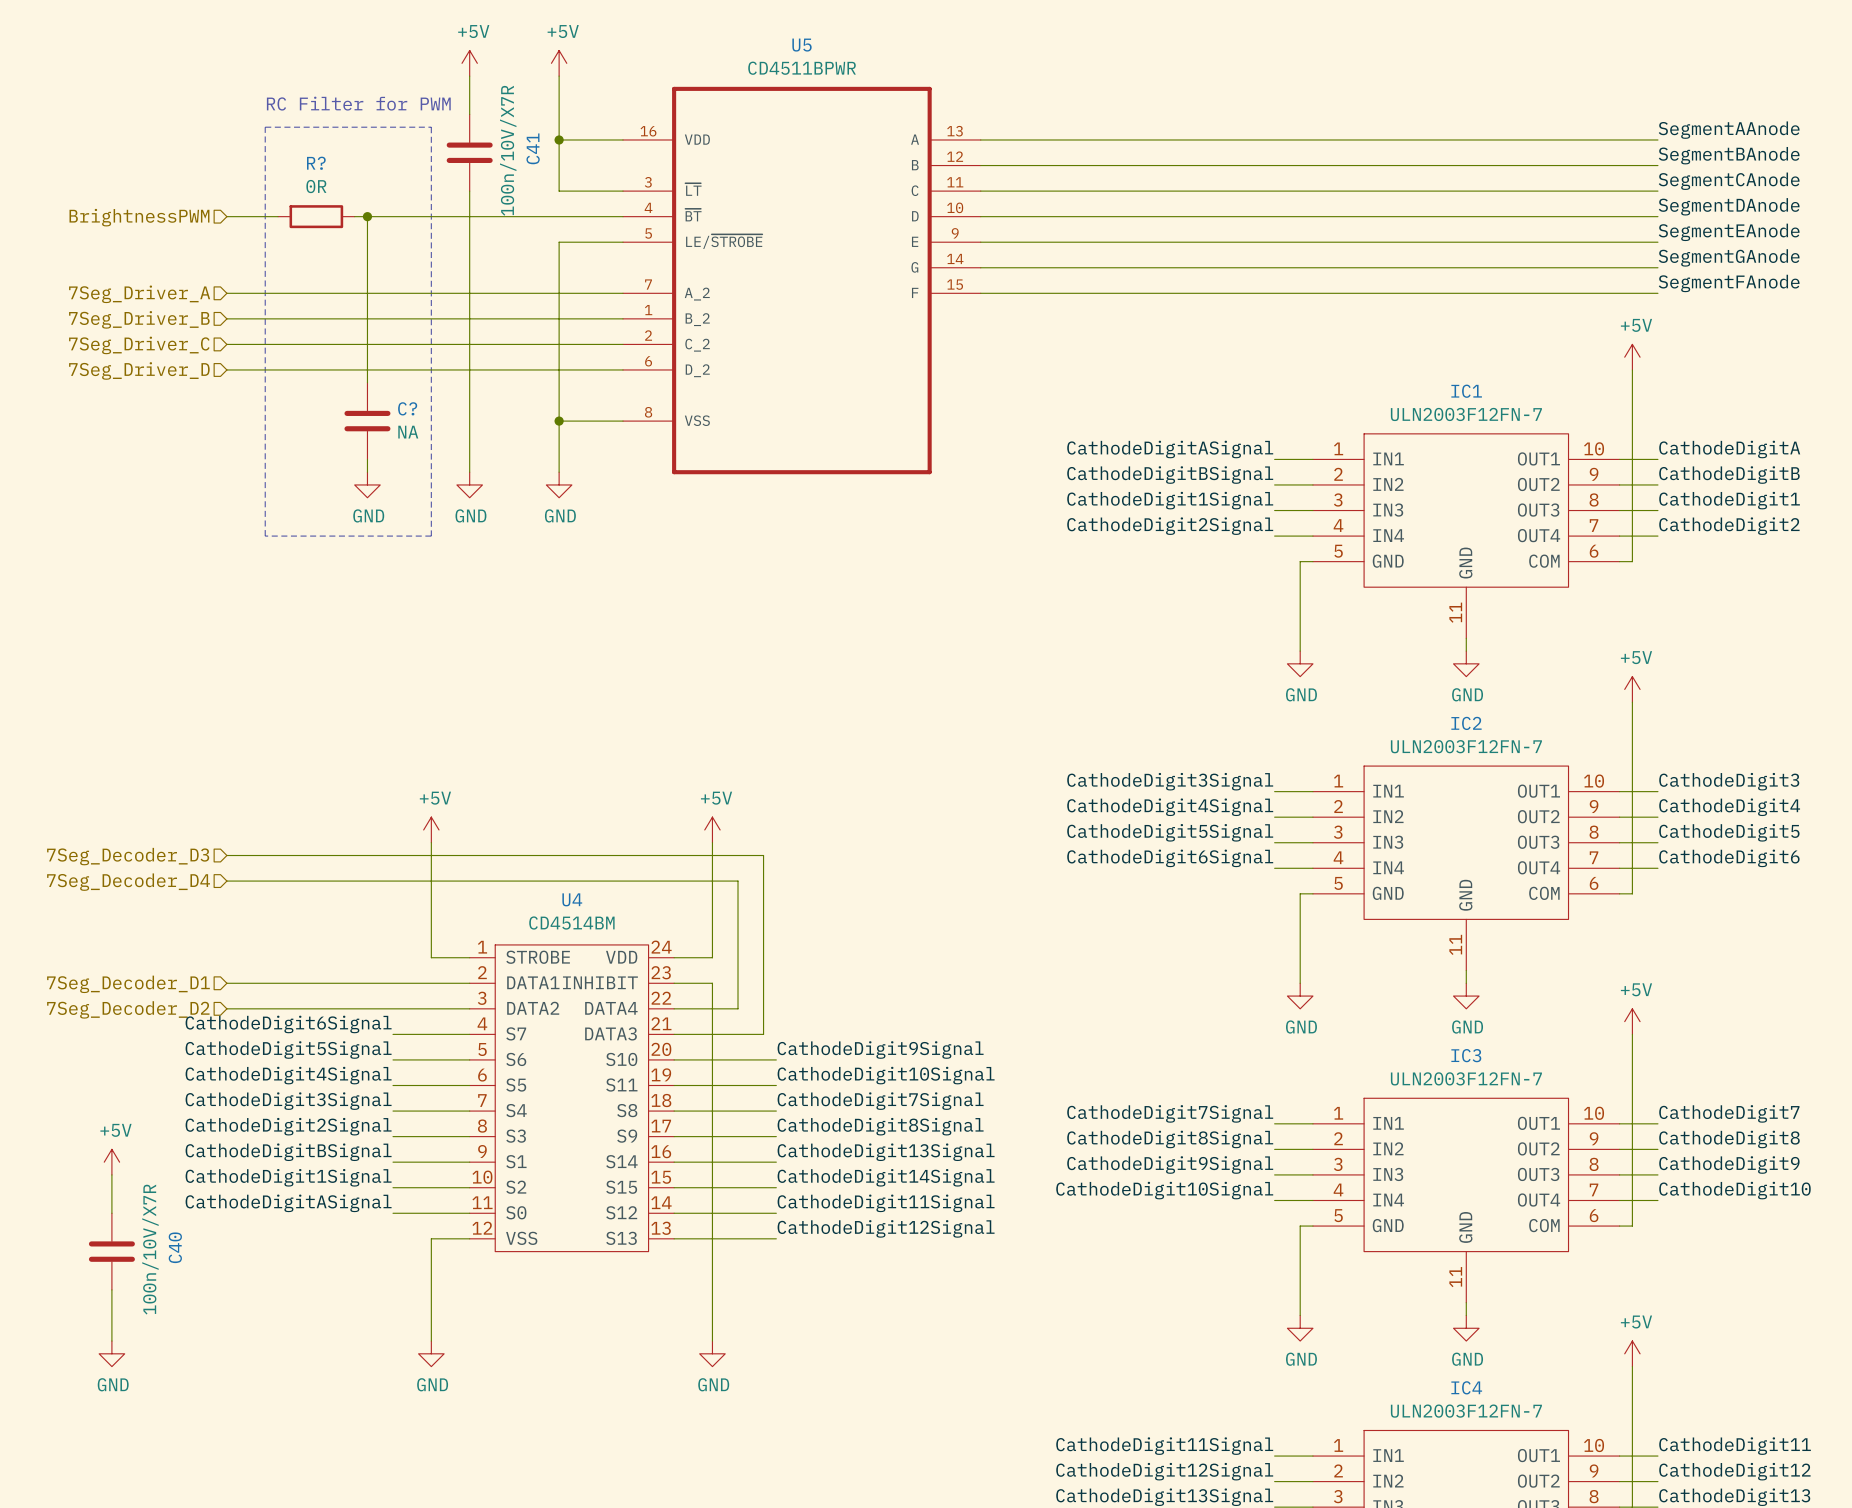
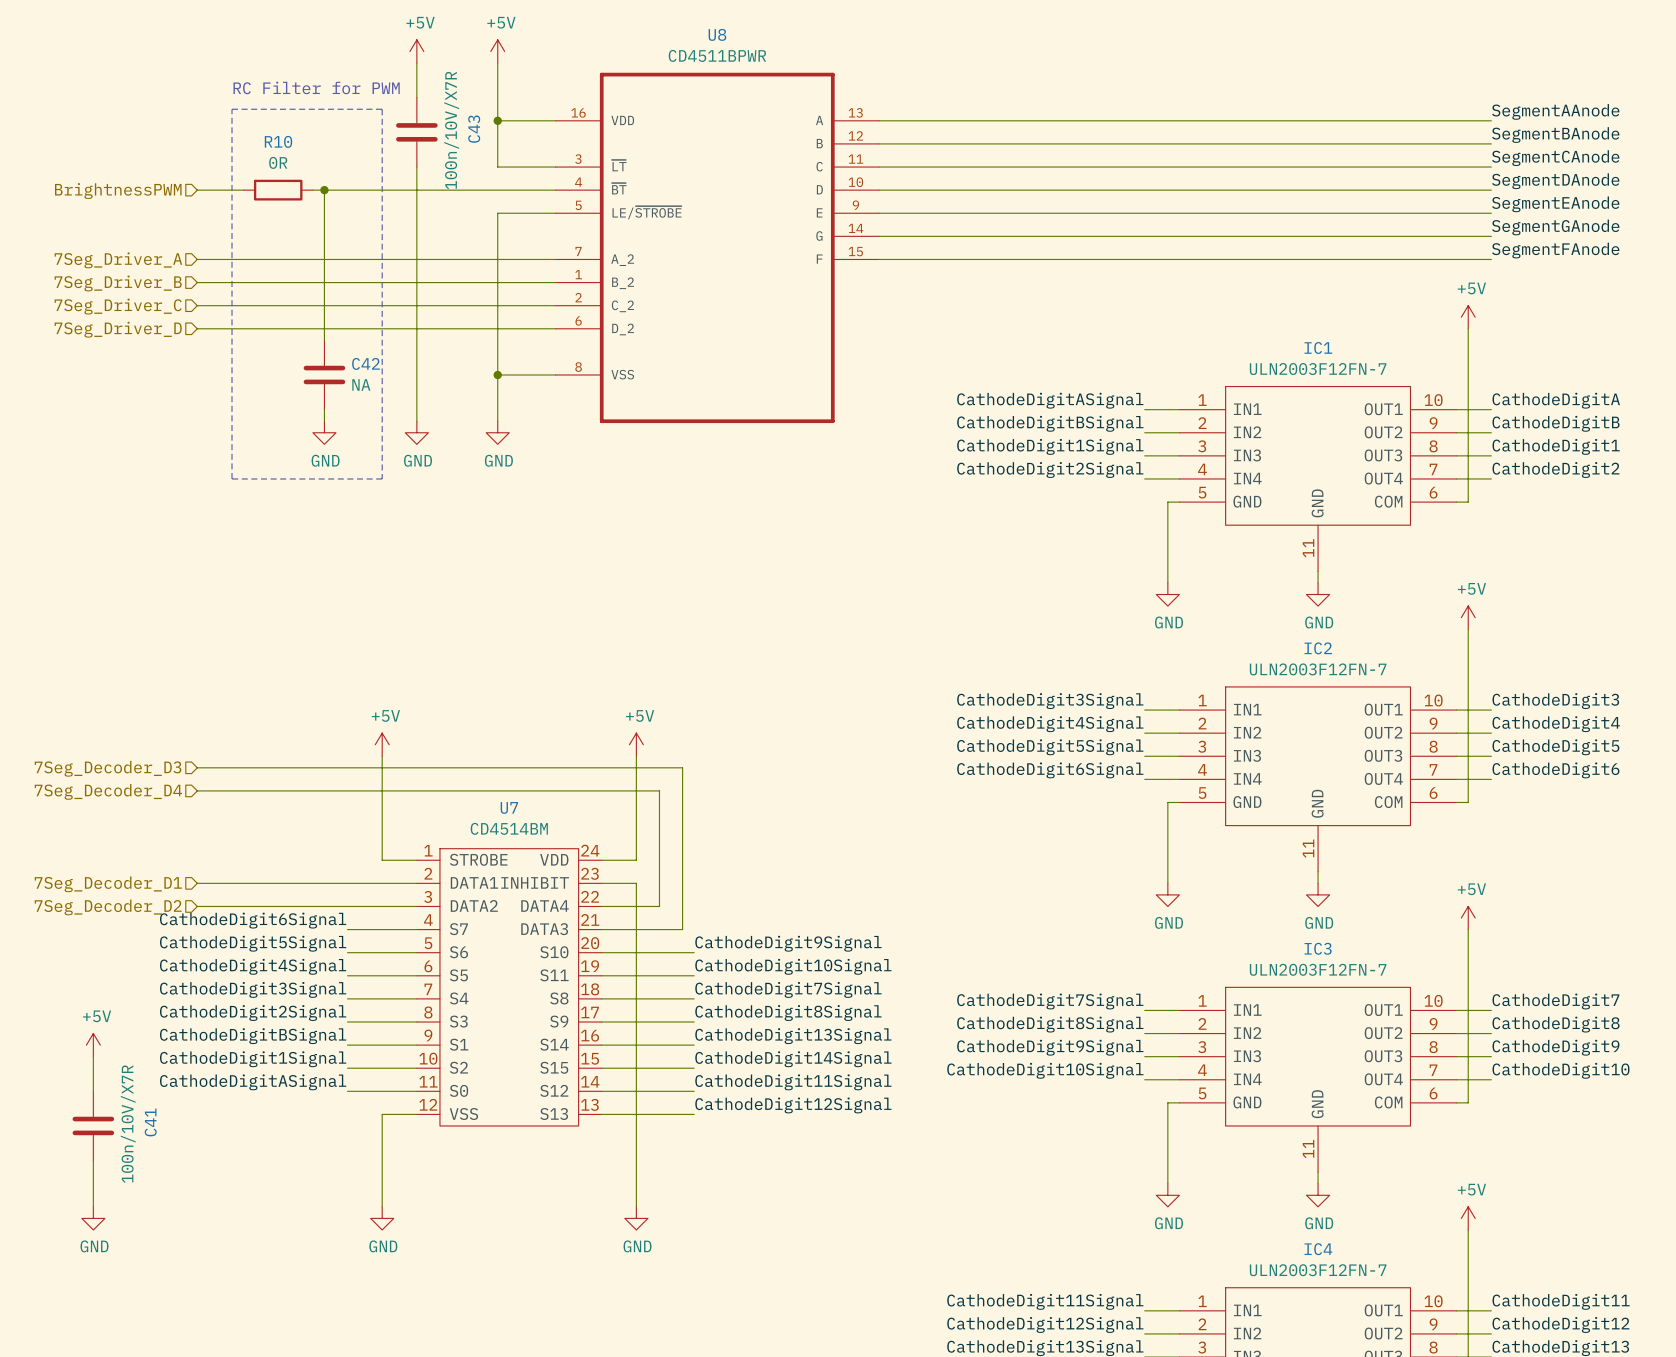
U5 name: U5 (802, 45) -> U8 (717, 34)
C41 name: C41 (533, 148) -> C43 (474, 129)
R? name: R? (316, 163) -> R10 (278, 141)
C? name: C? (407, 408) -> C42 (365, 363)
U4 name: U4 (572, 899) -> U7 (509, 807)
C40 name: C40 (175, 1247) -> C41 (150, 1122)

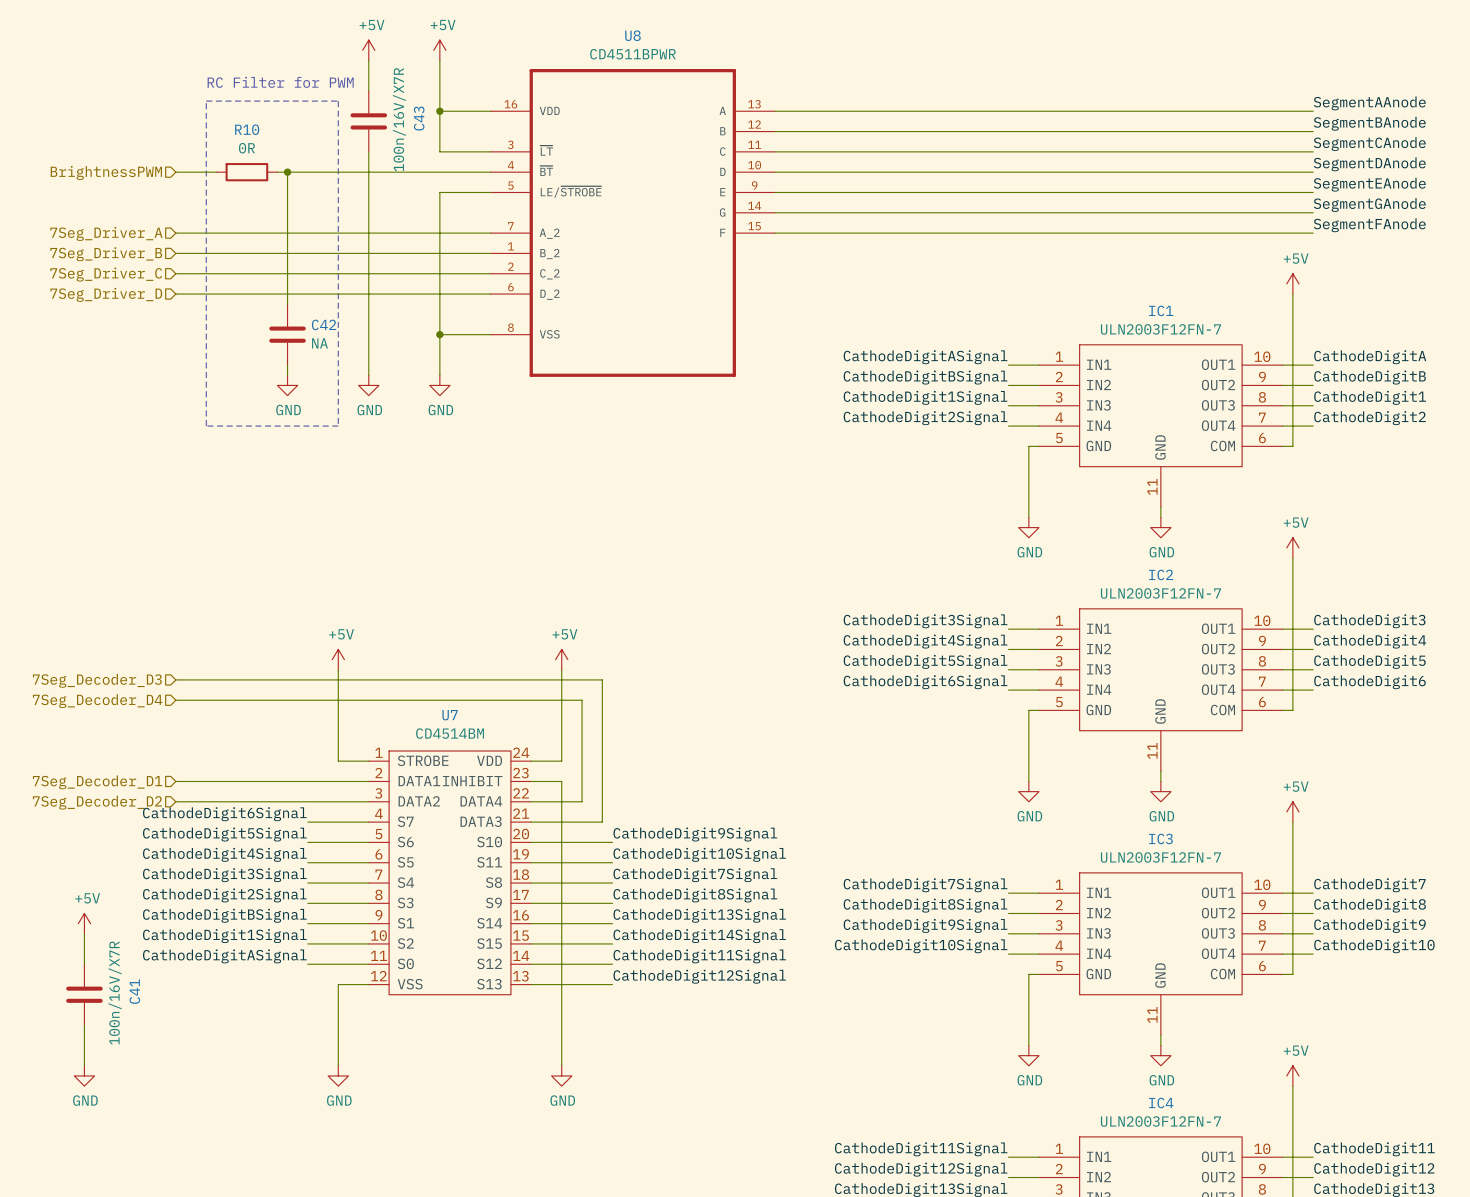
C43 value: 100n/10V/X7R (451, 130) -> 100n/16V/X7R (399, 119)
C41 value: 100n/10V/X7R (128, 1124) -> 100n/16V/X7R (115, 993)

